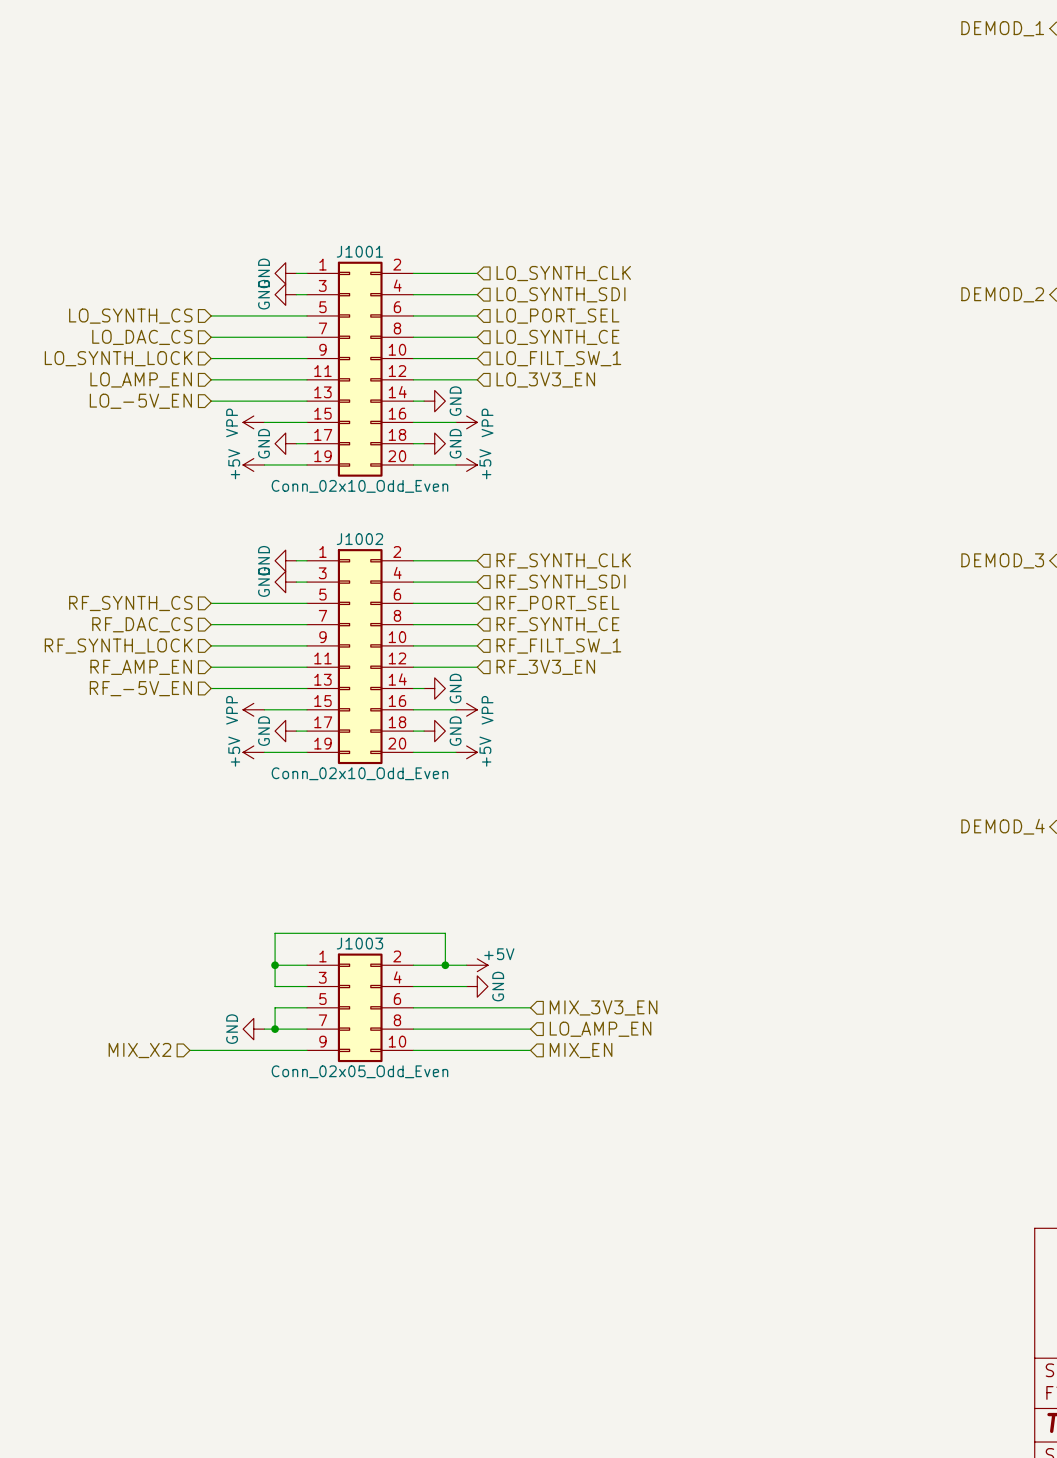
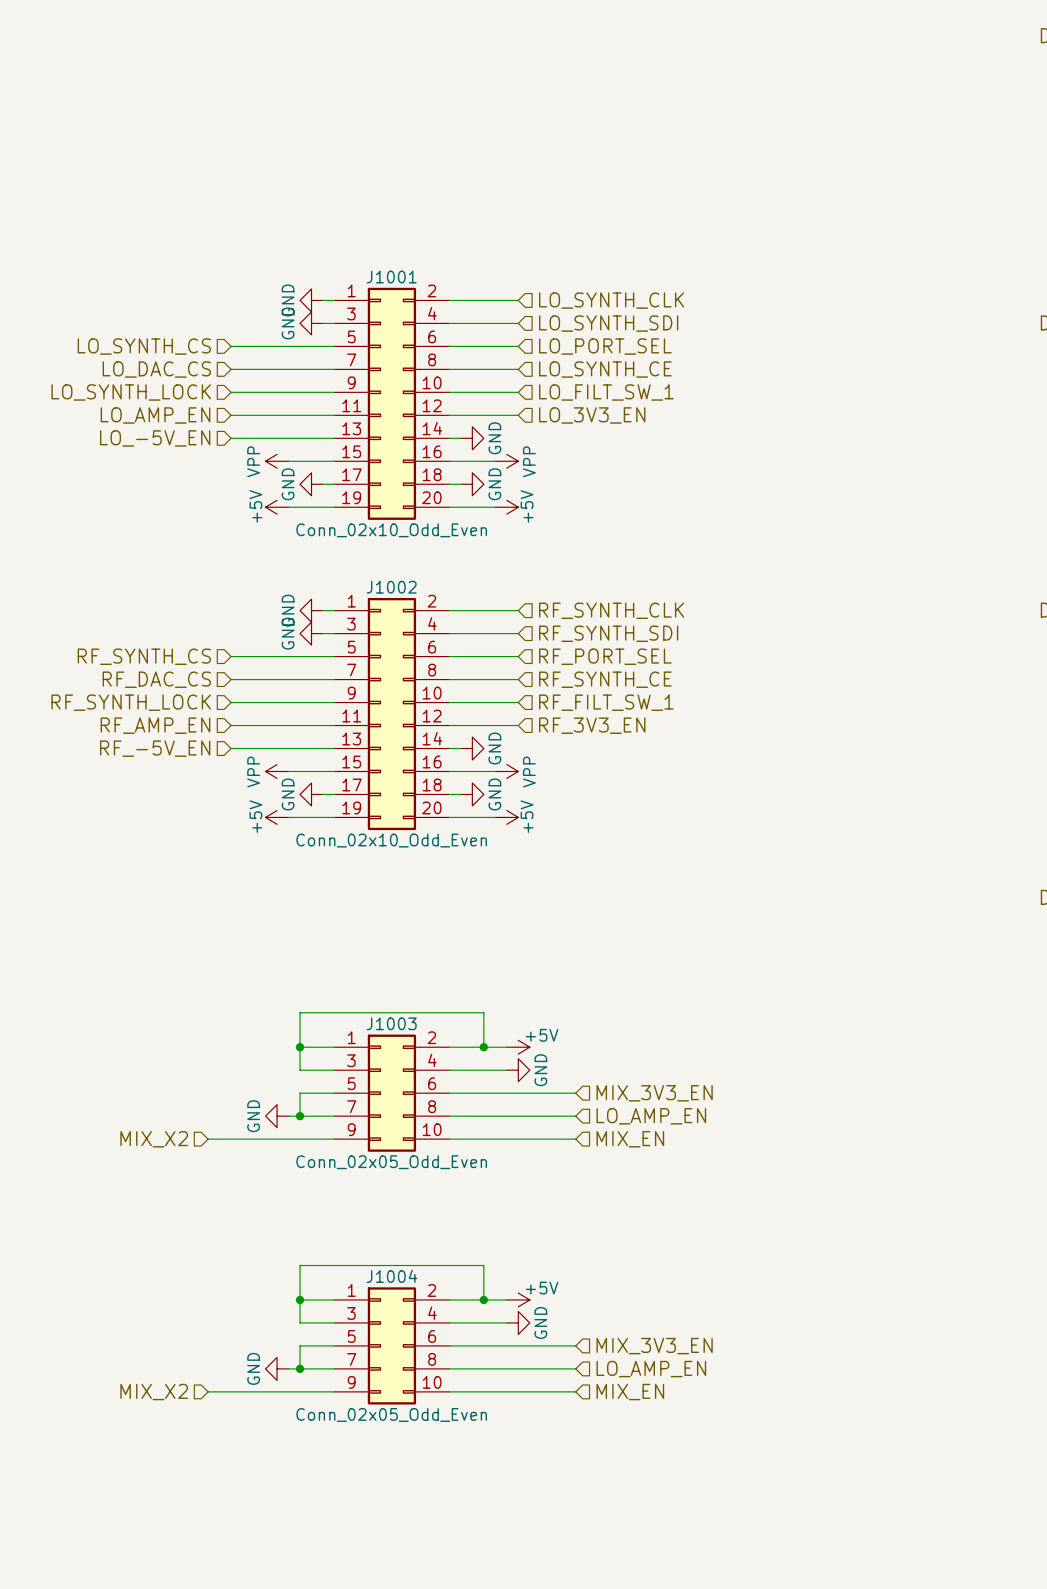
wire: none -> (300, 1299) (334, 1299)
junction: none -> (300, 1299)
wire: none -> (449, 1299) (506, 1299)
wire: none -> (483, 1299) (483, 1265) (300, 1265) (300, 1322) (334, 1322)
junction: none -> (483, 1299)
power symbol: none -> +5V (518, 1299)
wire: none -> (449, 1322) (506, 1322)
power symbol: none -> GND (518, 1322)
wire: none -> (334, 1345) (300, 1345) (300, 1368)
J1004: none -> Conn_02x05_Odd_Even (391, 1345)
wire: none -> (449, 1345) (575, 1345)
hierarchical label: none -> MIX_3V3_EN (654, 1346)
power symbol: none -> GND (277, 1368)
wire: none -> (288, 1368) (334, 1368)
junction: none -> (300, 1368)
wire: none -> (449, 1368) (575, 1368)
hierarchical label: none -> LO_AMP_EN (651, 1369)
hierarchical label: none -> MIX_X2 (154, 1392)
wire: none -> (208, 1391) (334, 1391)
wire: none -> (449, 1391) (575, 1391)
hierarchical label: none -> MIX_EN (630, 1392)

